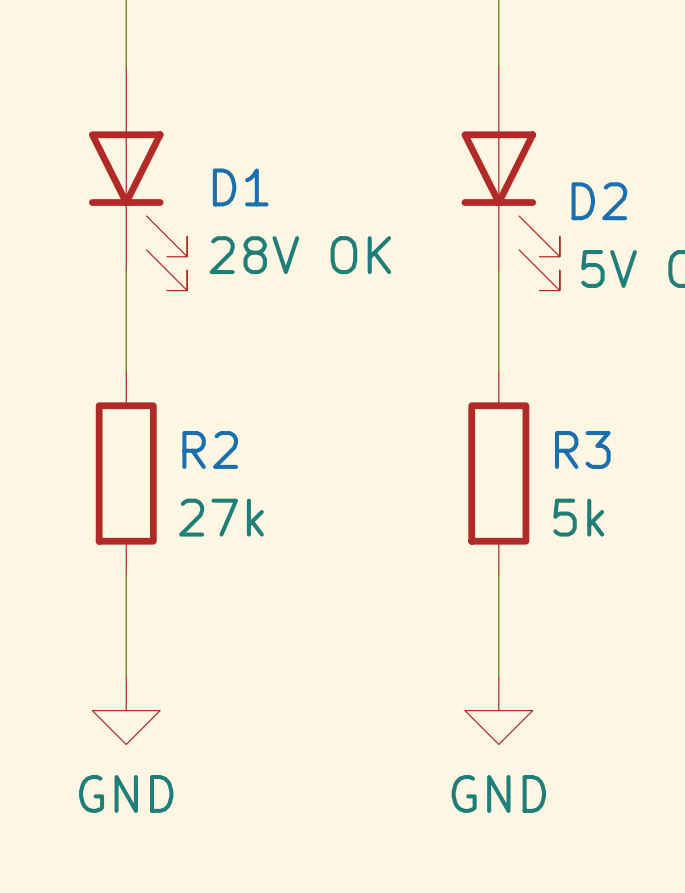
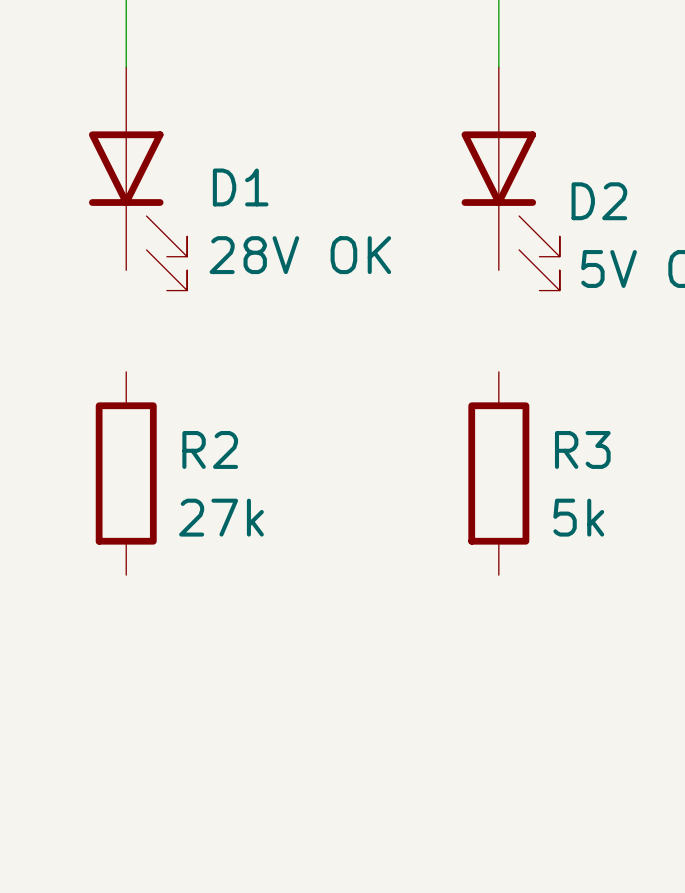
wire: (126, 270) (126, 371) -> none
wire: (498, 270) (498, 371) -> none
wire: (126, 575) (126, 676) -> none
wire: (498, 575) (498, 676) -> none
power symbol: GND (126, 710) -> none
power symbol: GND (498, 710) -> none

